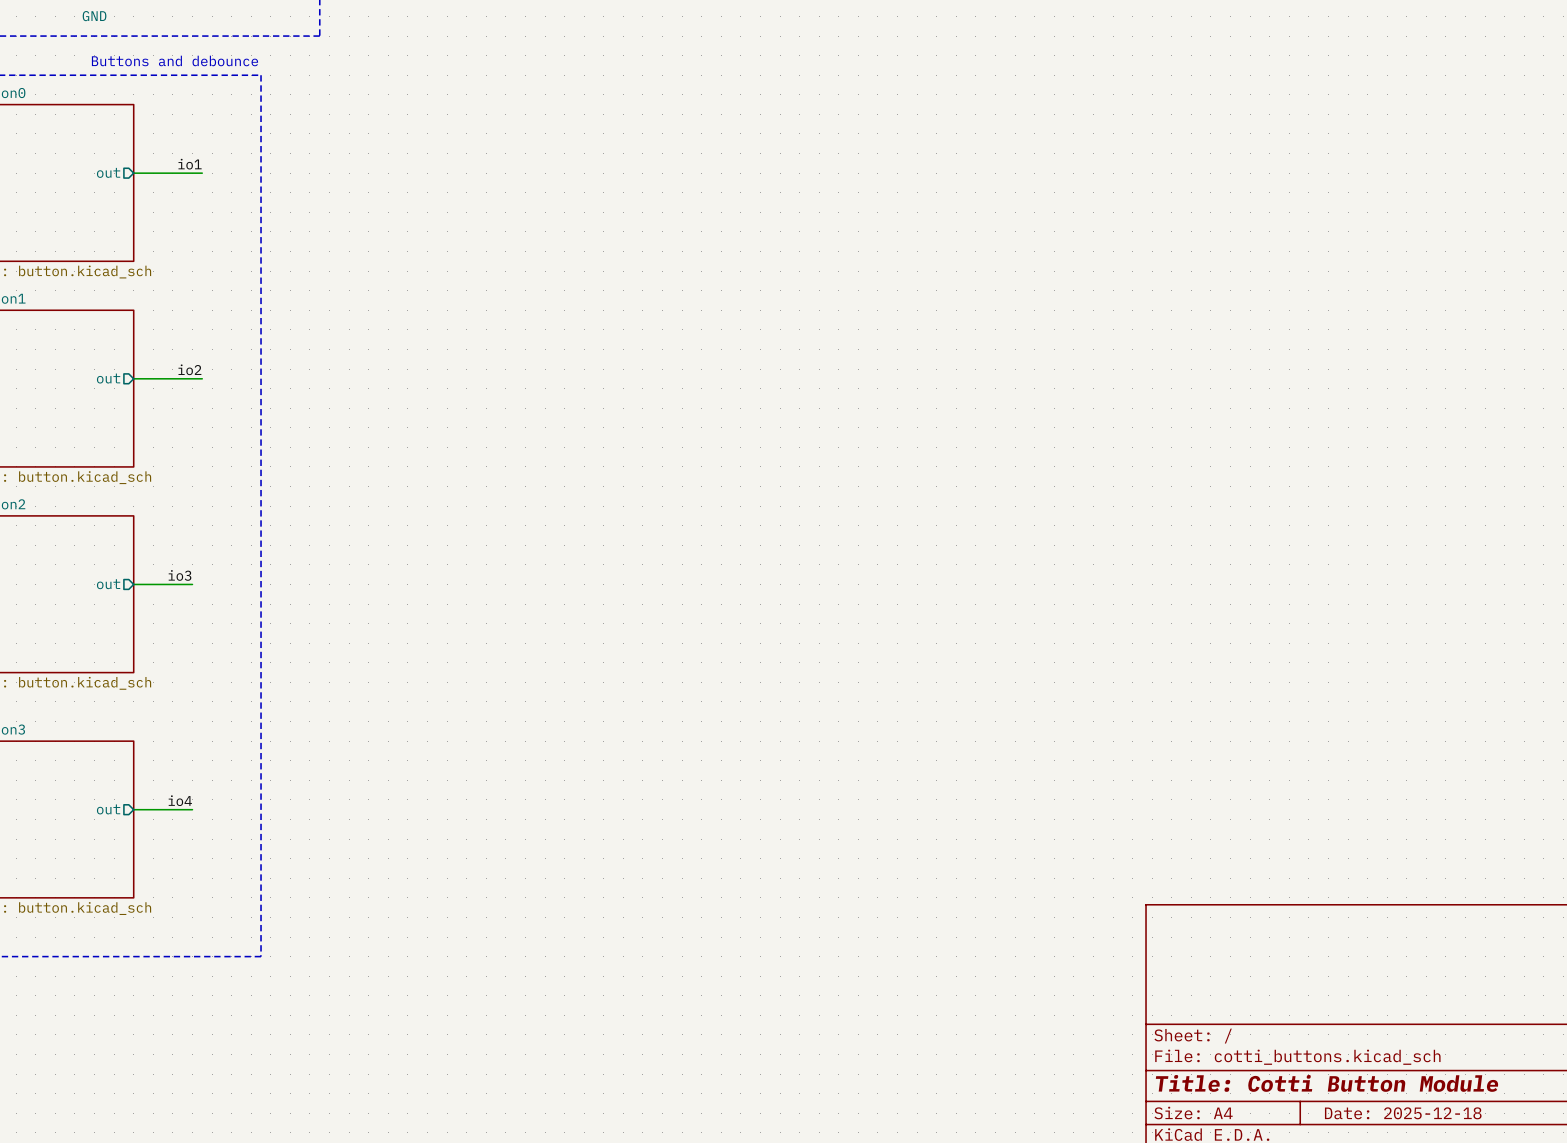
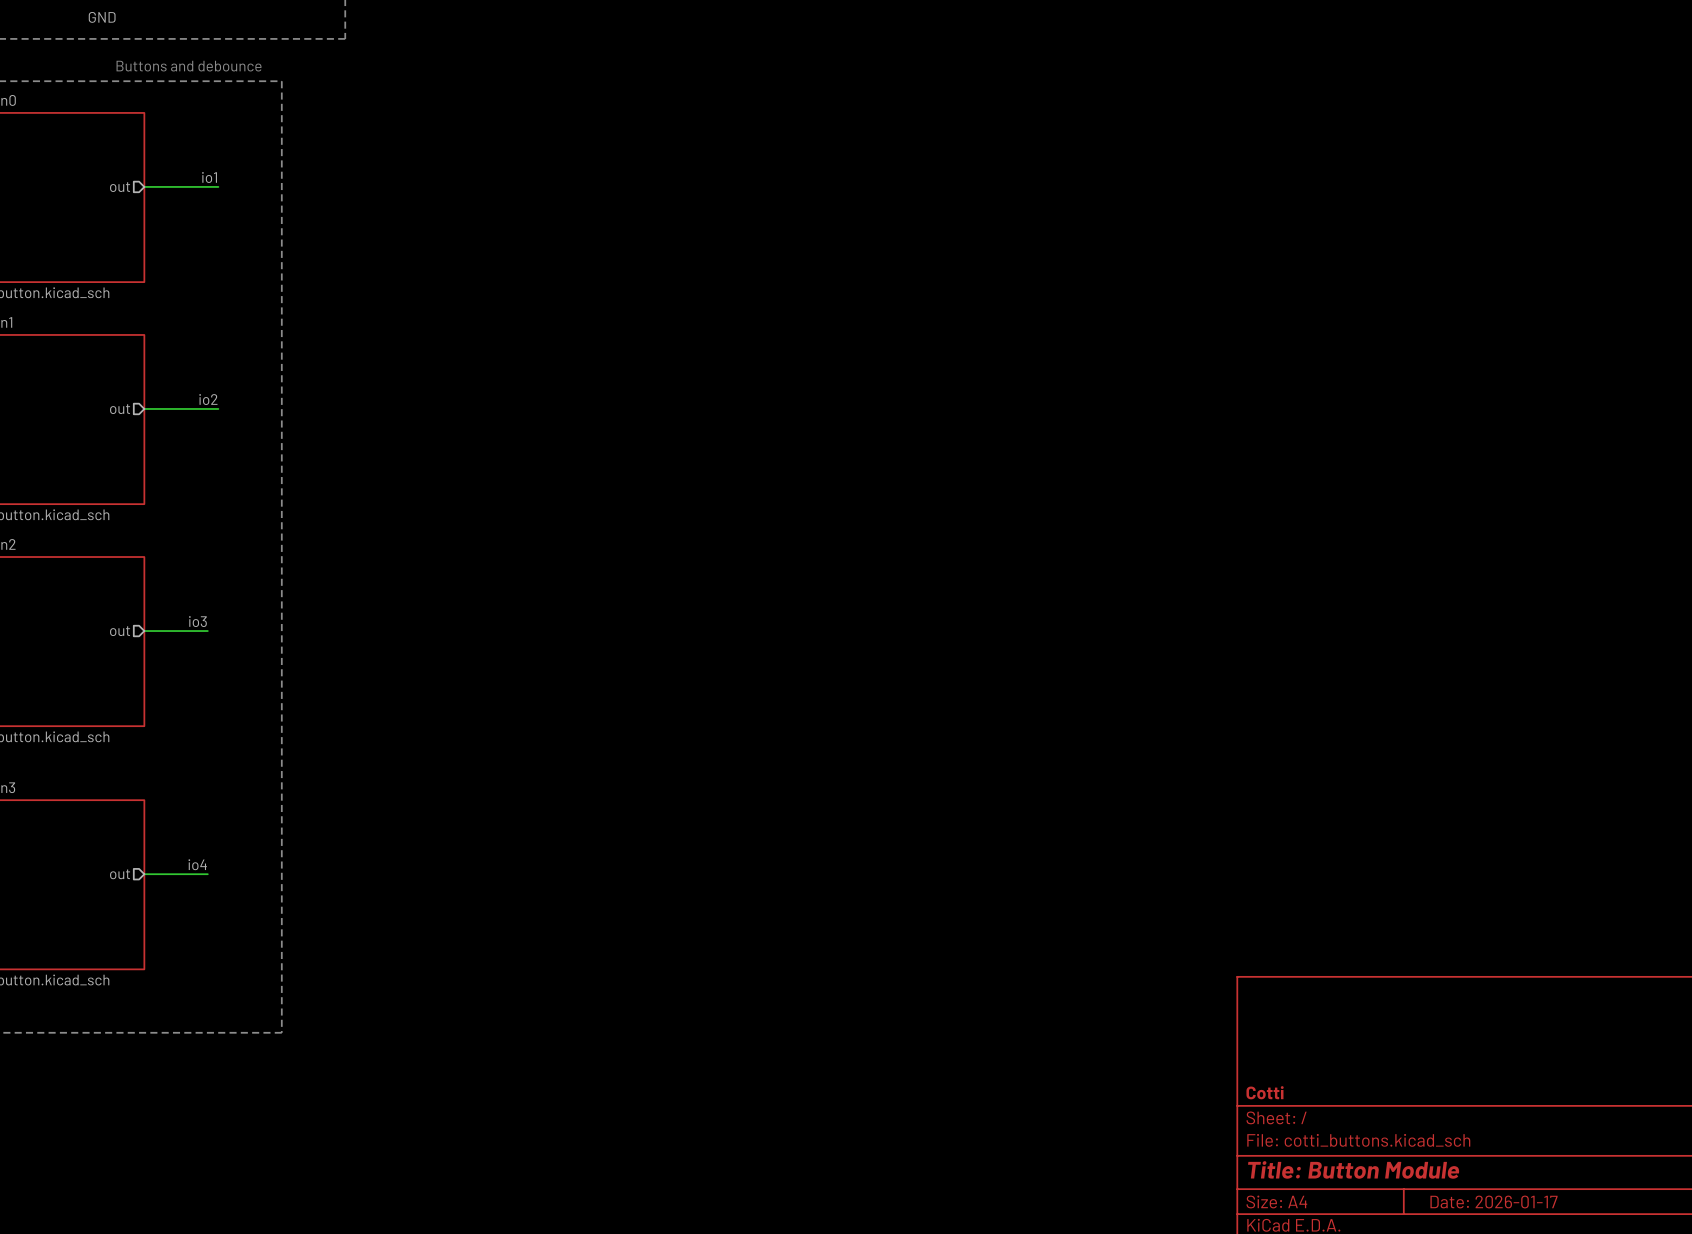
title block: none -> Cotti (1265, 1092)
title block: Title: Cotti Button Module (1327, 1083) -> Title: Button Module (1353, 1169)
title block: Date: 2025-12-18 (1403, 1113) -> Date: 2026-01-17 (1494, 1202)

